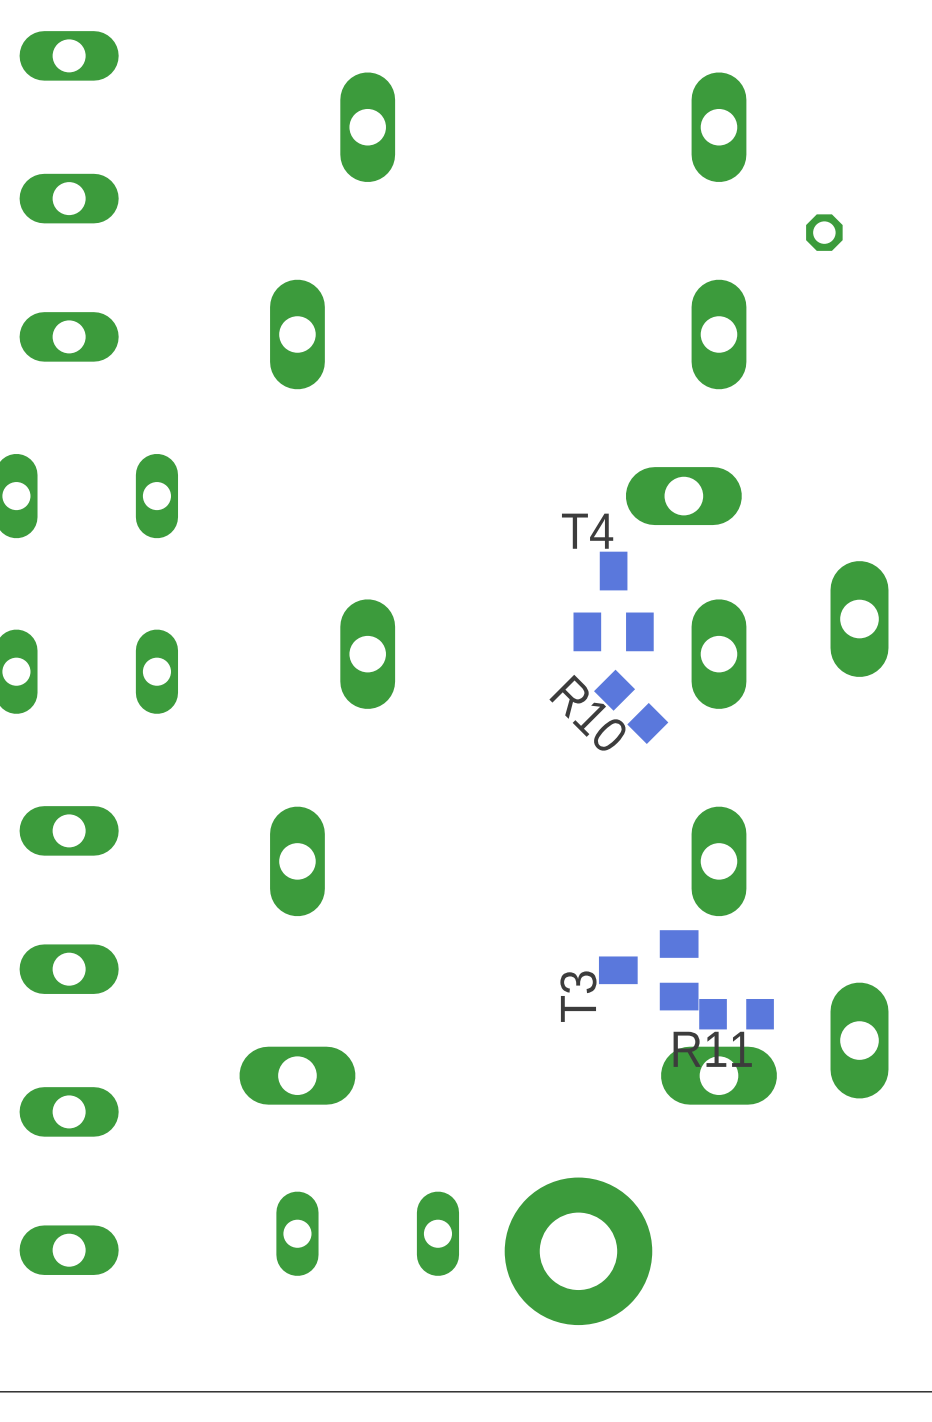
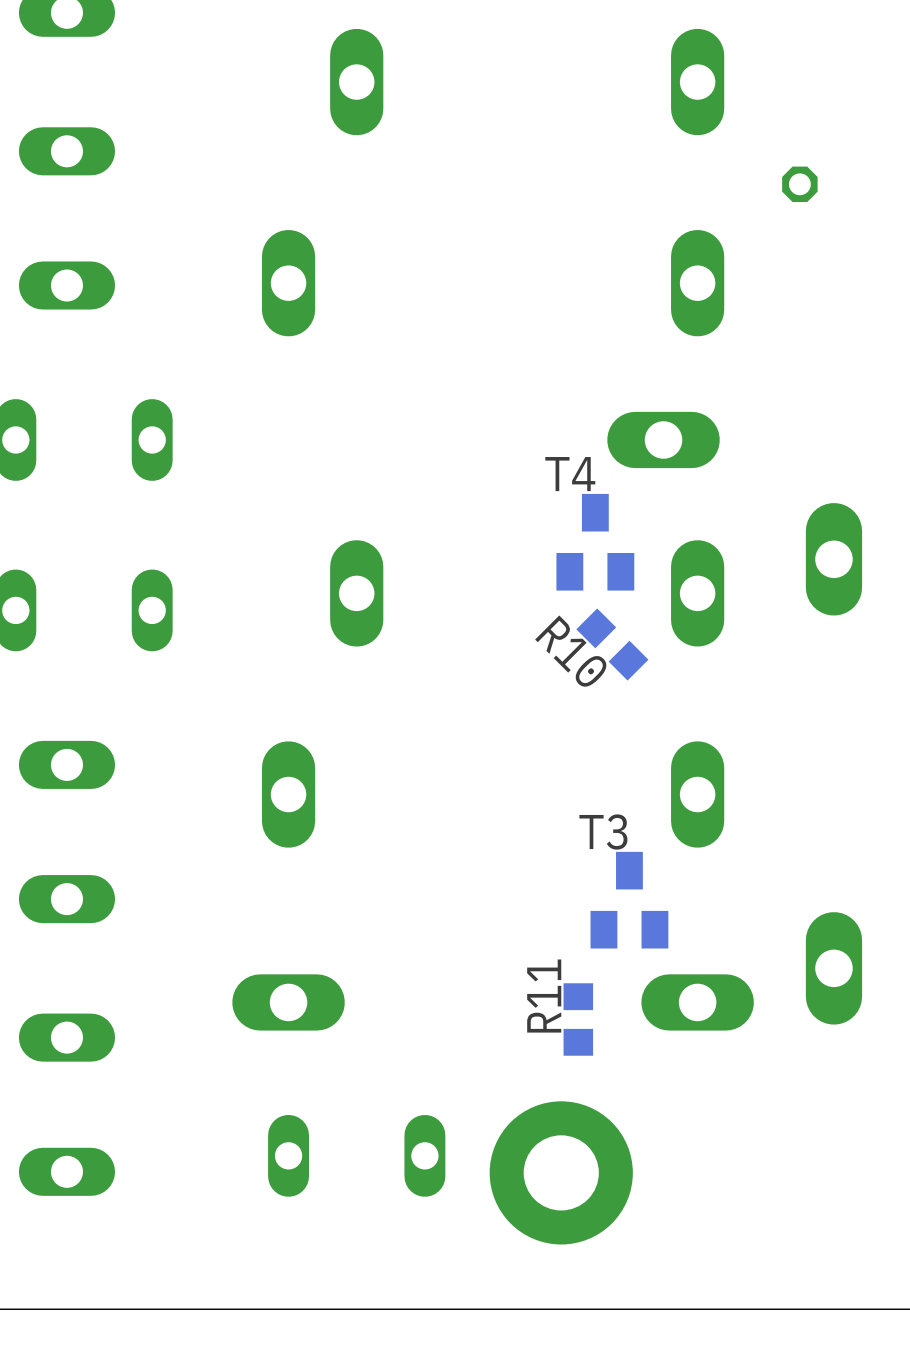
T3 rotation: 0° (648, 970) -> 90° clockwise (629, 900)
R11 rotation: 0° (736, 1014) -> 90° clockwise (578, 1019)
R11 position: (736, 1014) -> (578, 1019)

